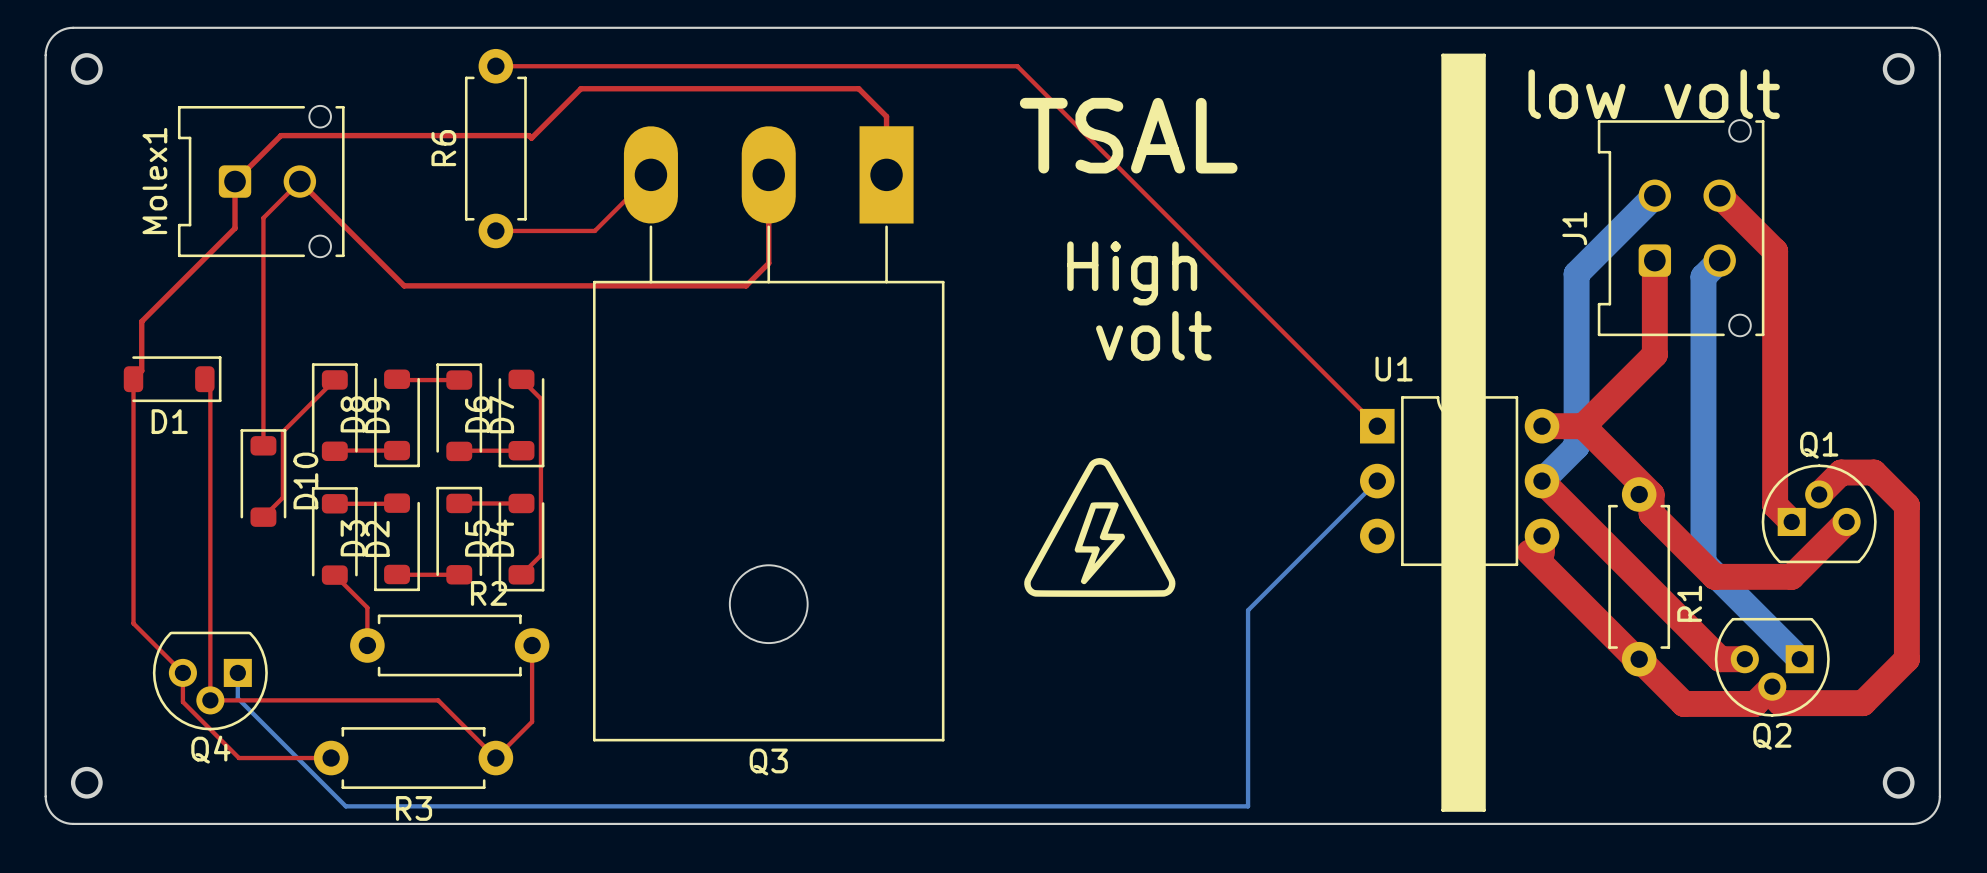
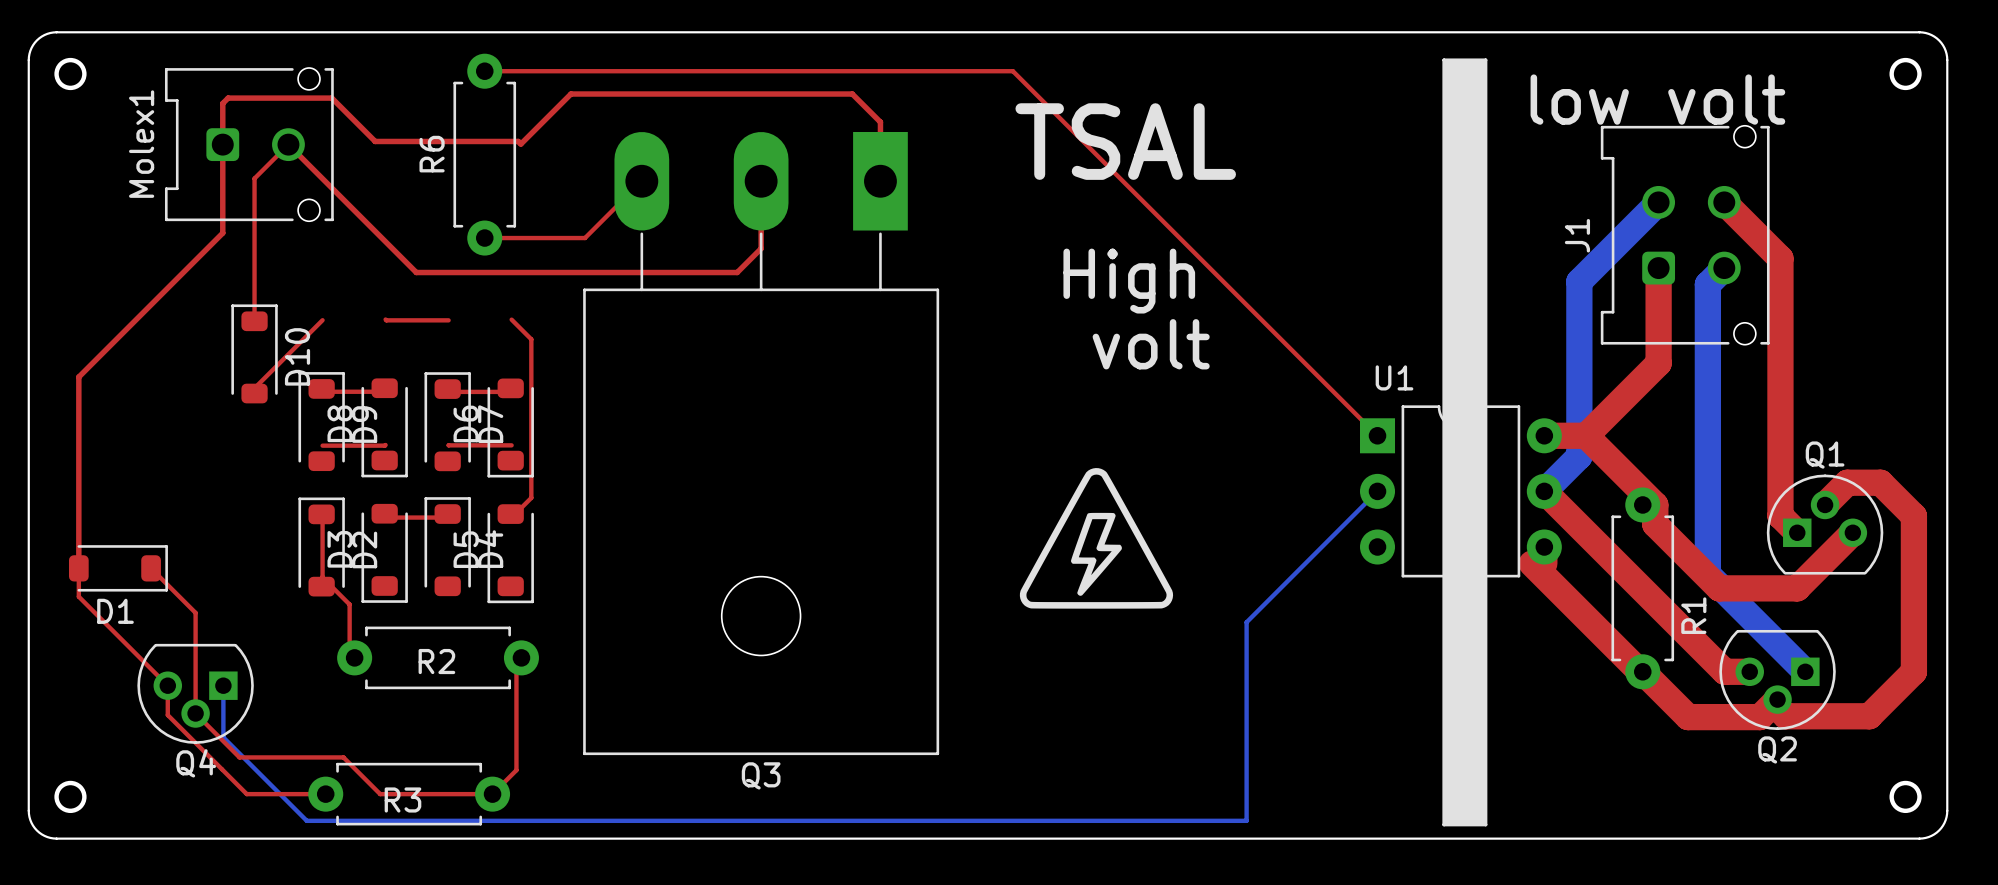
top track: (387, 135) (280, 135) (235, 181) (235, 228) -> (375, 141) (331, 98) (228, 98) (222, 103) (222, 233) (220, 235)
Molex1 position: (261, 181) -> (249, 144)
top track: (768, 241) (768, 263) (746, 285) (404, 285) (299, 181) (263, 217) (263, 445) -> (761, 248) (737, 272) (416, 272) (288, 144) (254, 178) (254, 321)
top track: none -> (322, 320) (254, 388) (254, 393)
top track: (141, 321) (141, 370) (140, 372) -> none
top track: (133, 379) (133, 623) -> (126, 329) (78, 377) (78, 596) (117, 635)
D1 position: (172, 379) -> (118, 568)
top track: (204, 379) (210, 384) (210, 601) -> (151, 568) (195, 612)
top track: (334, 379) (282, 431) (282, 497) (263, 517) -> none
top track: (397, 379) (459, 380) -> (385, 319) (448, 320)
top track: (521, 379) (540, 398) (540, 555) (521, 574) -> (511, 319) (531, 339) (531, 497) (511, 517)
top track: (397, 450) (334, 451) -> (385, 391) (322, 392)
top track: (521, 450) (459, 451) -> (511, 391) (448, 392)
D10 position: (263, 478) -> (254, 353)
top track: (397, 503) (334, 503) -> (385, 445) (322, 445)
top track: (459, 503) (521, 503) -> (448, 445) (511, 445)
top track: none -> (322, 517) (322, 577)
top track: none -> (322, 577) (349, 604) (349, 647)
top track: (397, 574) (459, 574) -> (385, 517) (448, 517)
top track: (334, 575) (367, 607) (367, 645) -> none
R2 name position: R2 (489, 593) -> R2 (436, 661)
top track: (532, 645) (532, 721) (495, 758) (438, 700) (210, 700) -> (516, 647) (516, 770) (492, 794) (380, 794) (343, 757) (239, 757) (195, 713)
bottom track: (237, 698) (345, 806) -> (223, 711) (223, 737) (306, 820) (332, 820)
top track: (238, 758) (331, 758) -> (224, 771) (246, 794) (325, 794)
R3 position: (413, 758) -> (409, 794)
R3 name position: R3 (414, 808) -> R3 (402, 799)

